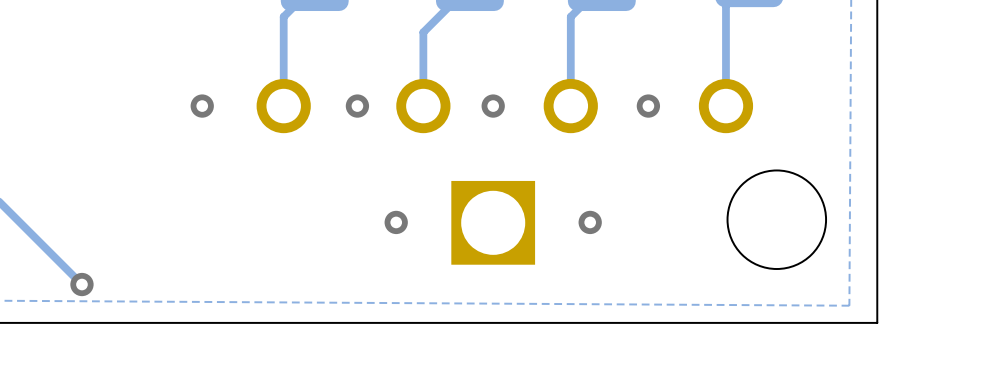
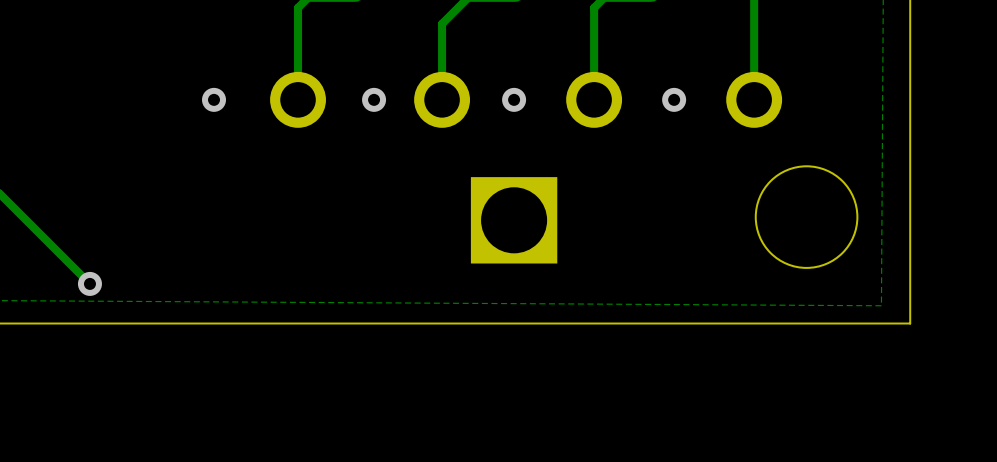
via: (396, 222) -> none
via: (590, 222) -> none

